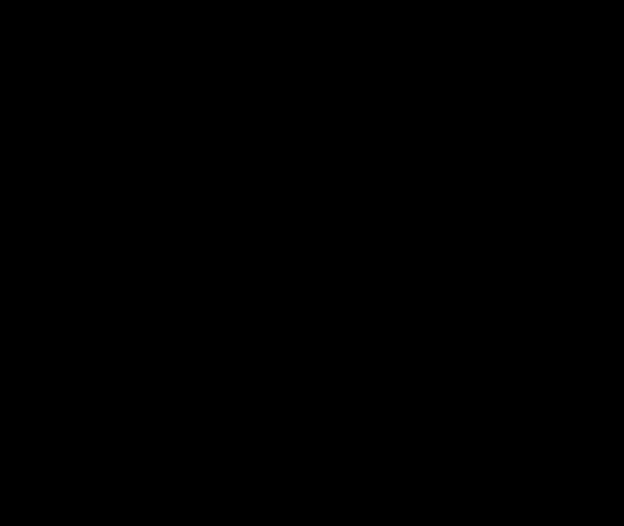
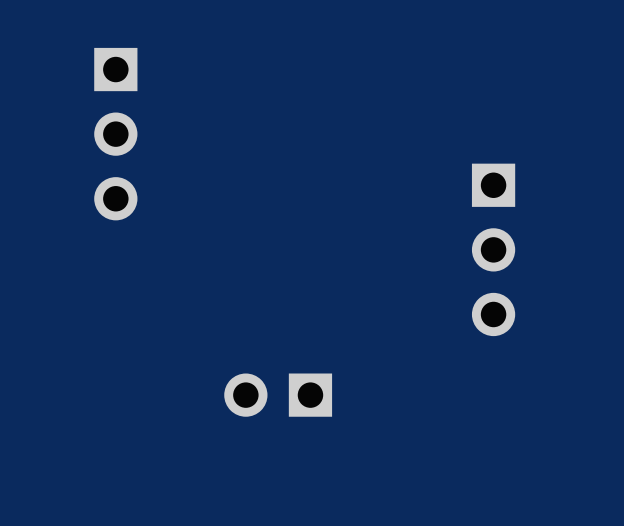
part: none -> (115, 134)
part: none -> (493, 249)
part: none -> (278, 395)

